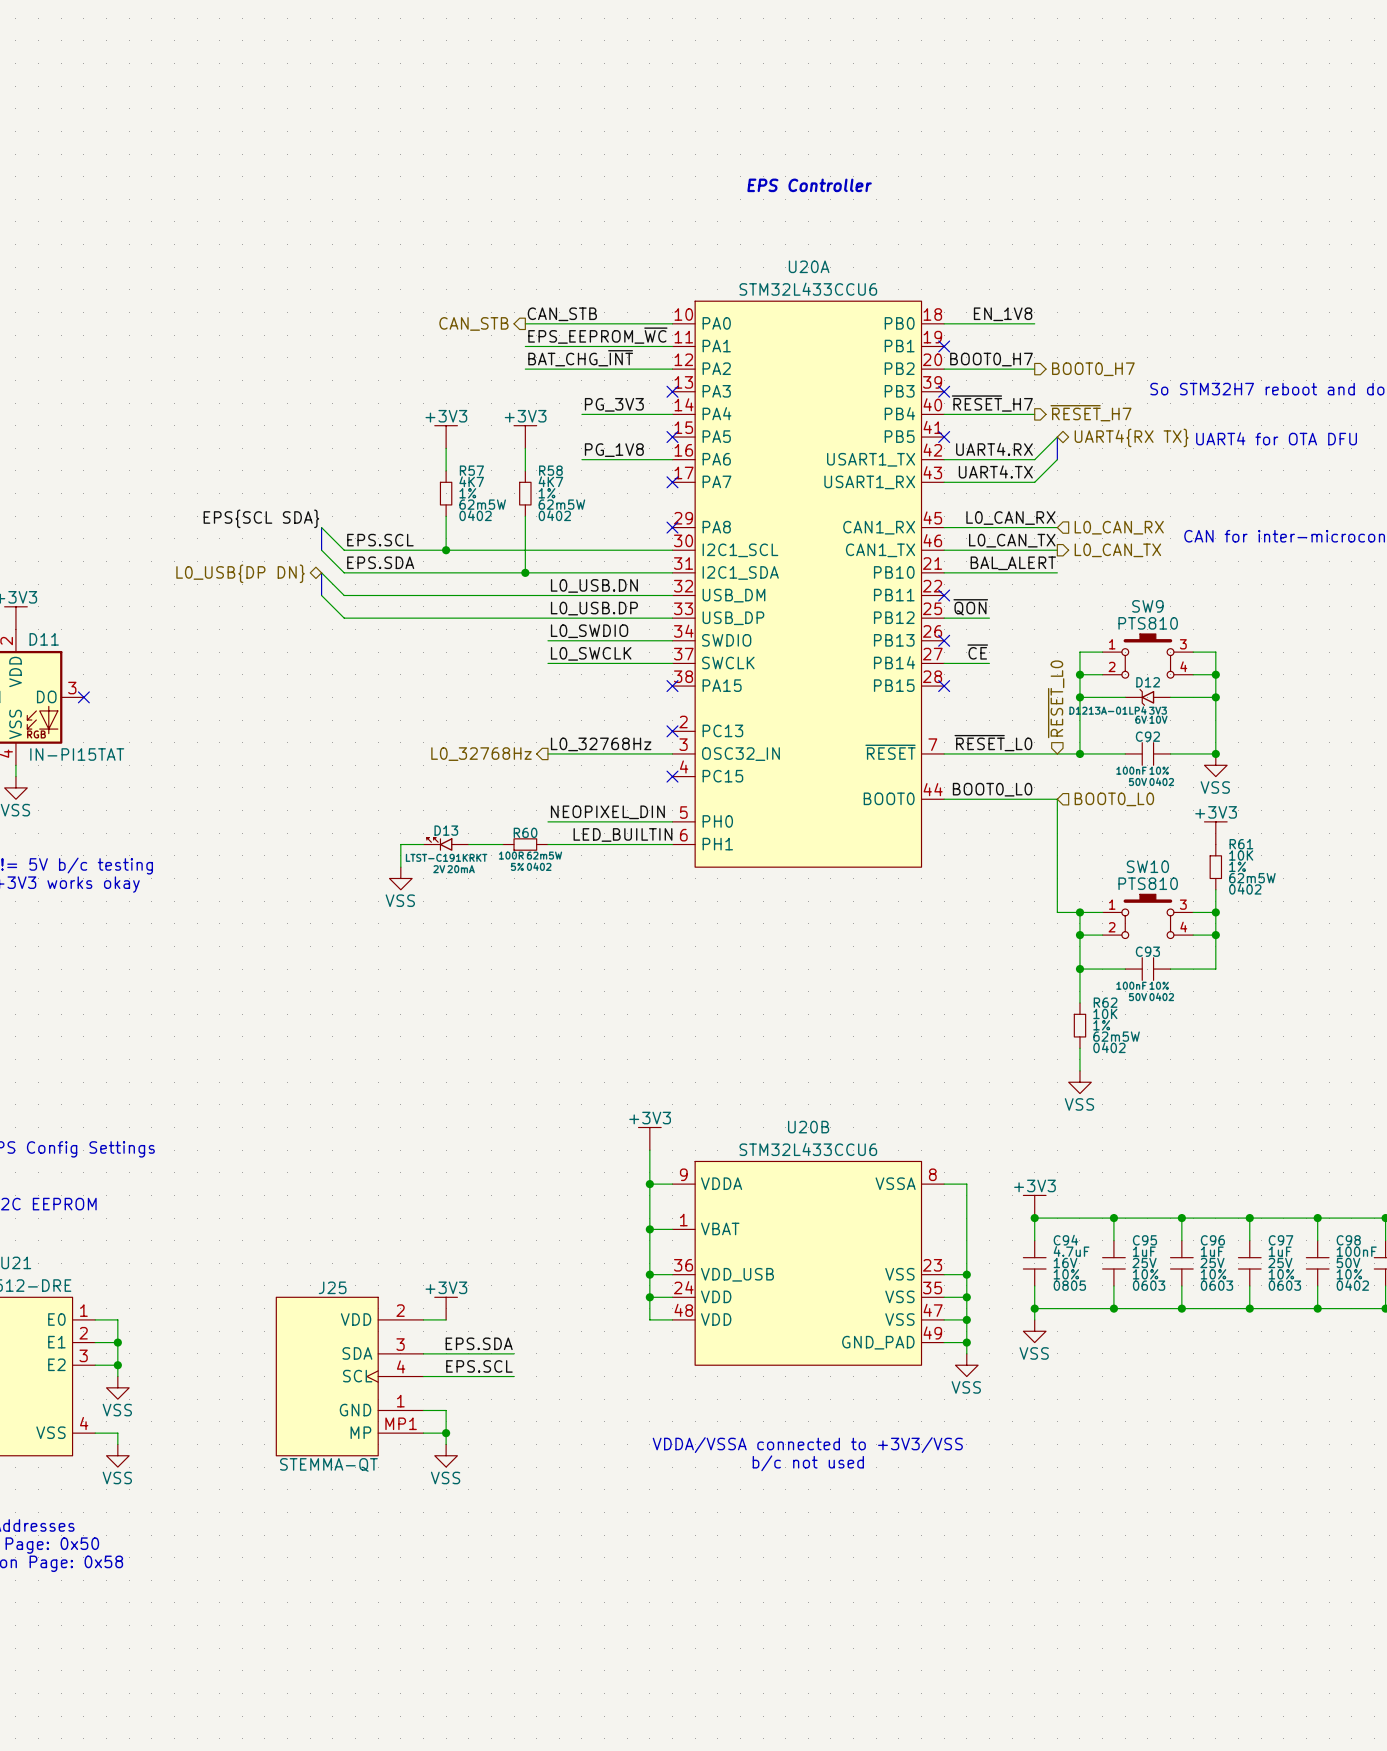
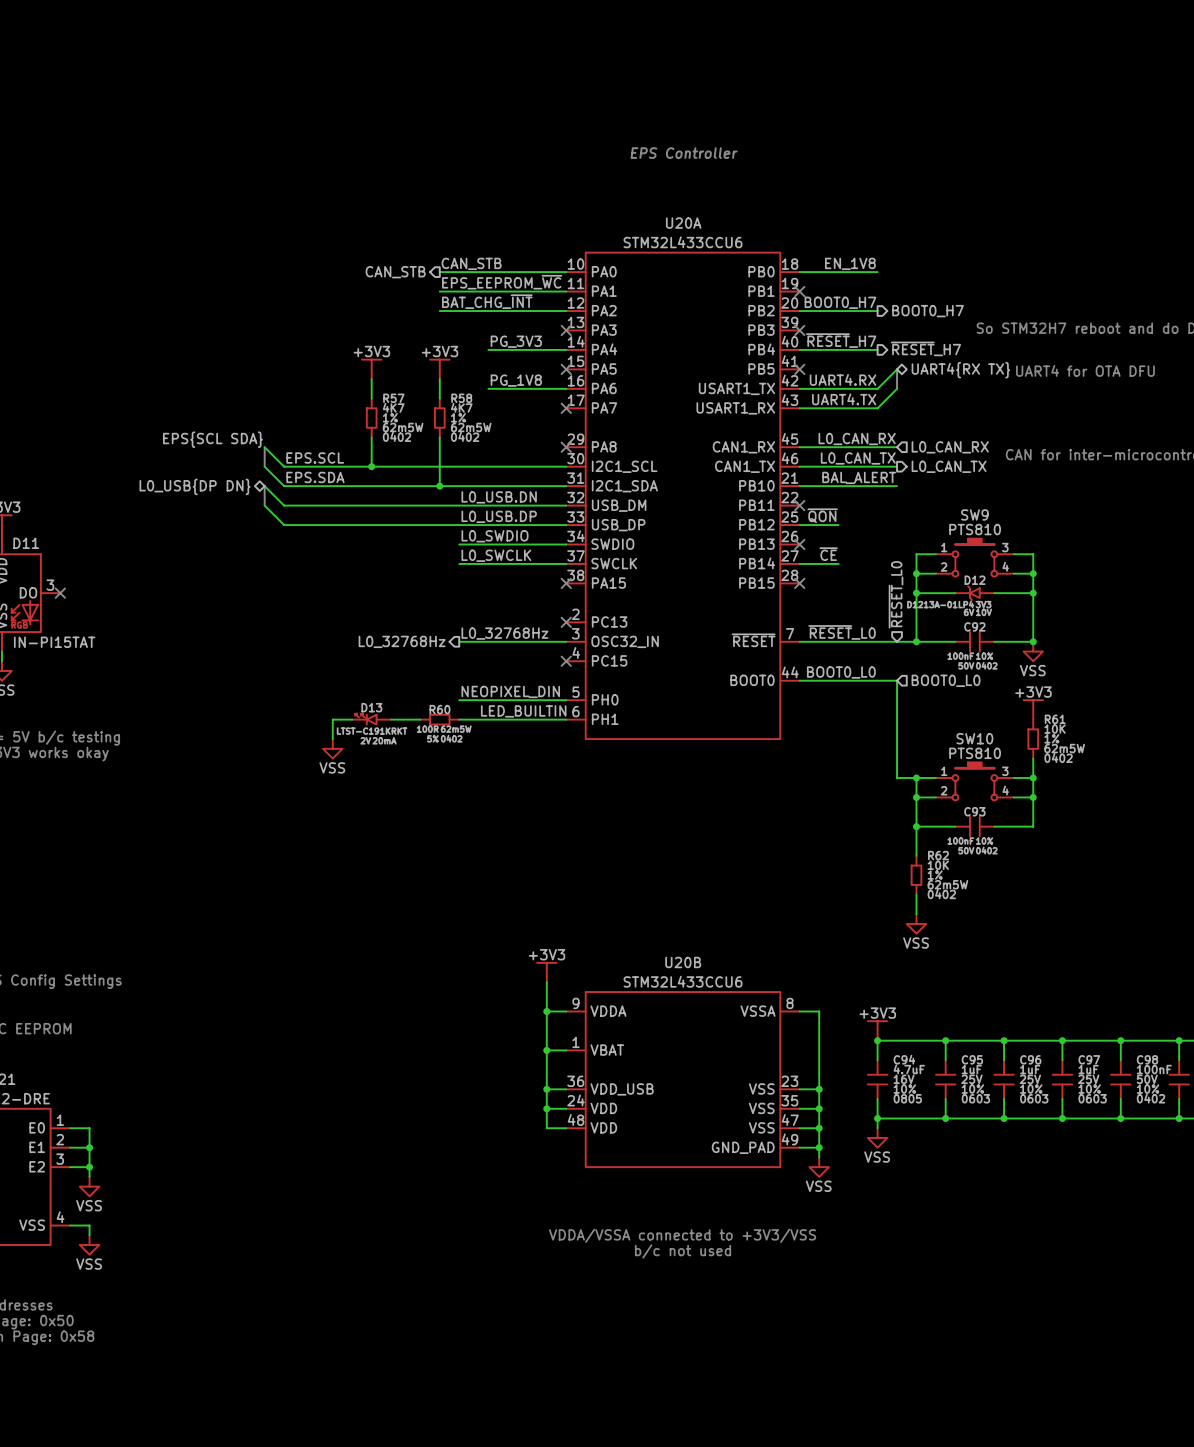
power symbol: +3V3 (446, 1308) -> none
wire: (423, 1319) (446, 1319) -> none
label: EPS.SDA (479, 1343) -> none
wire: (423, 1353) (514, 1353) -> none
label: EPS.SCL (479, 1366) -> none
J25: STEMMA-QT (349, 1376) -> none
wire: (423, 1376) (514, 1376) -> none
wire: (423, 1410) (446, 1410) (446, 1444) -> none
wire: (423, 1433) (446, 1433) -> none
junction: (446, 1433) -> none
power symbol: VSS (446, 1455) -> none

